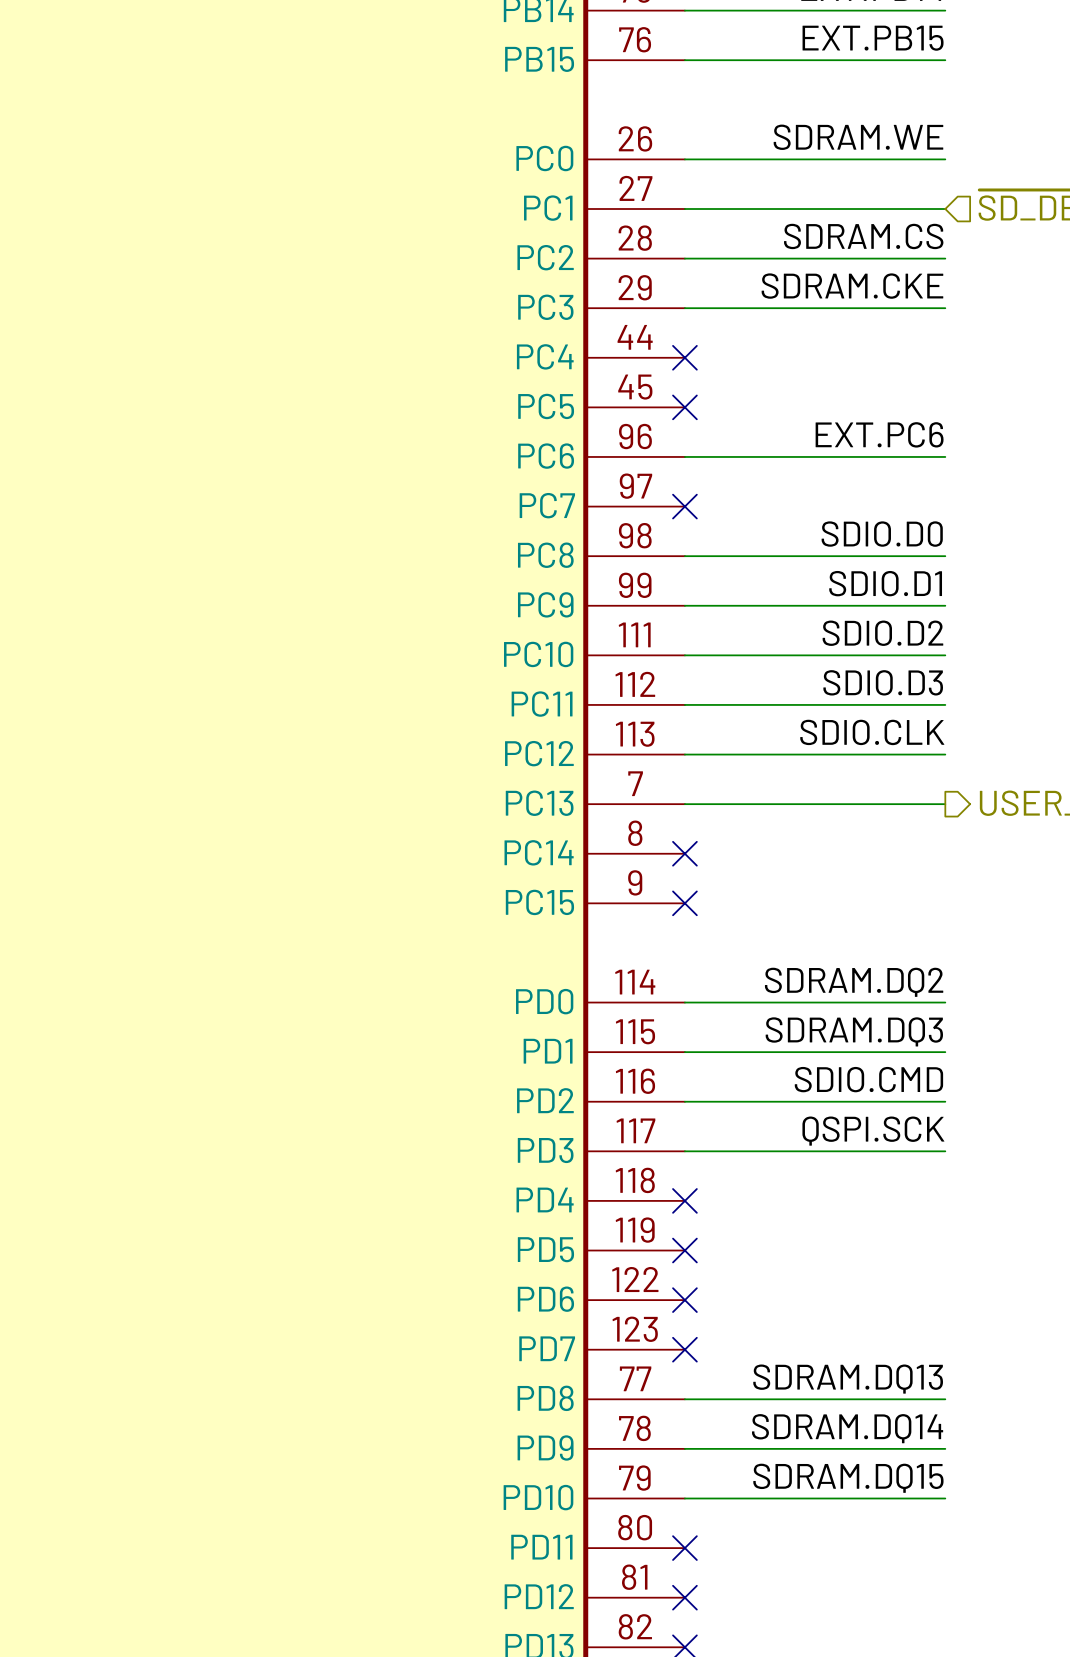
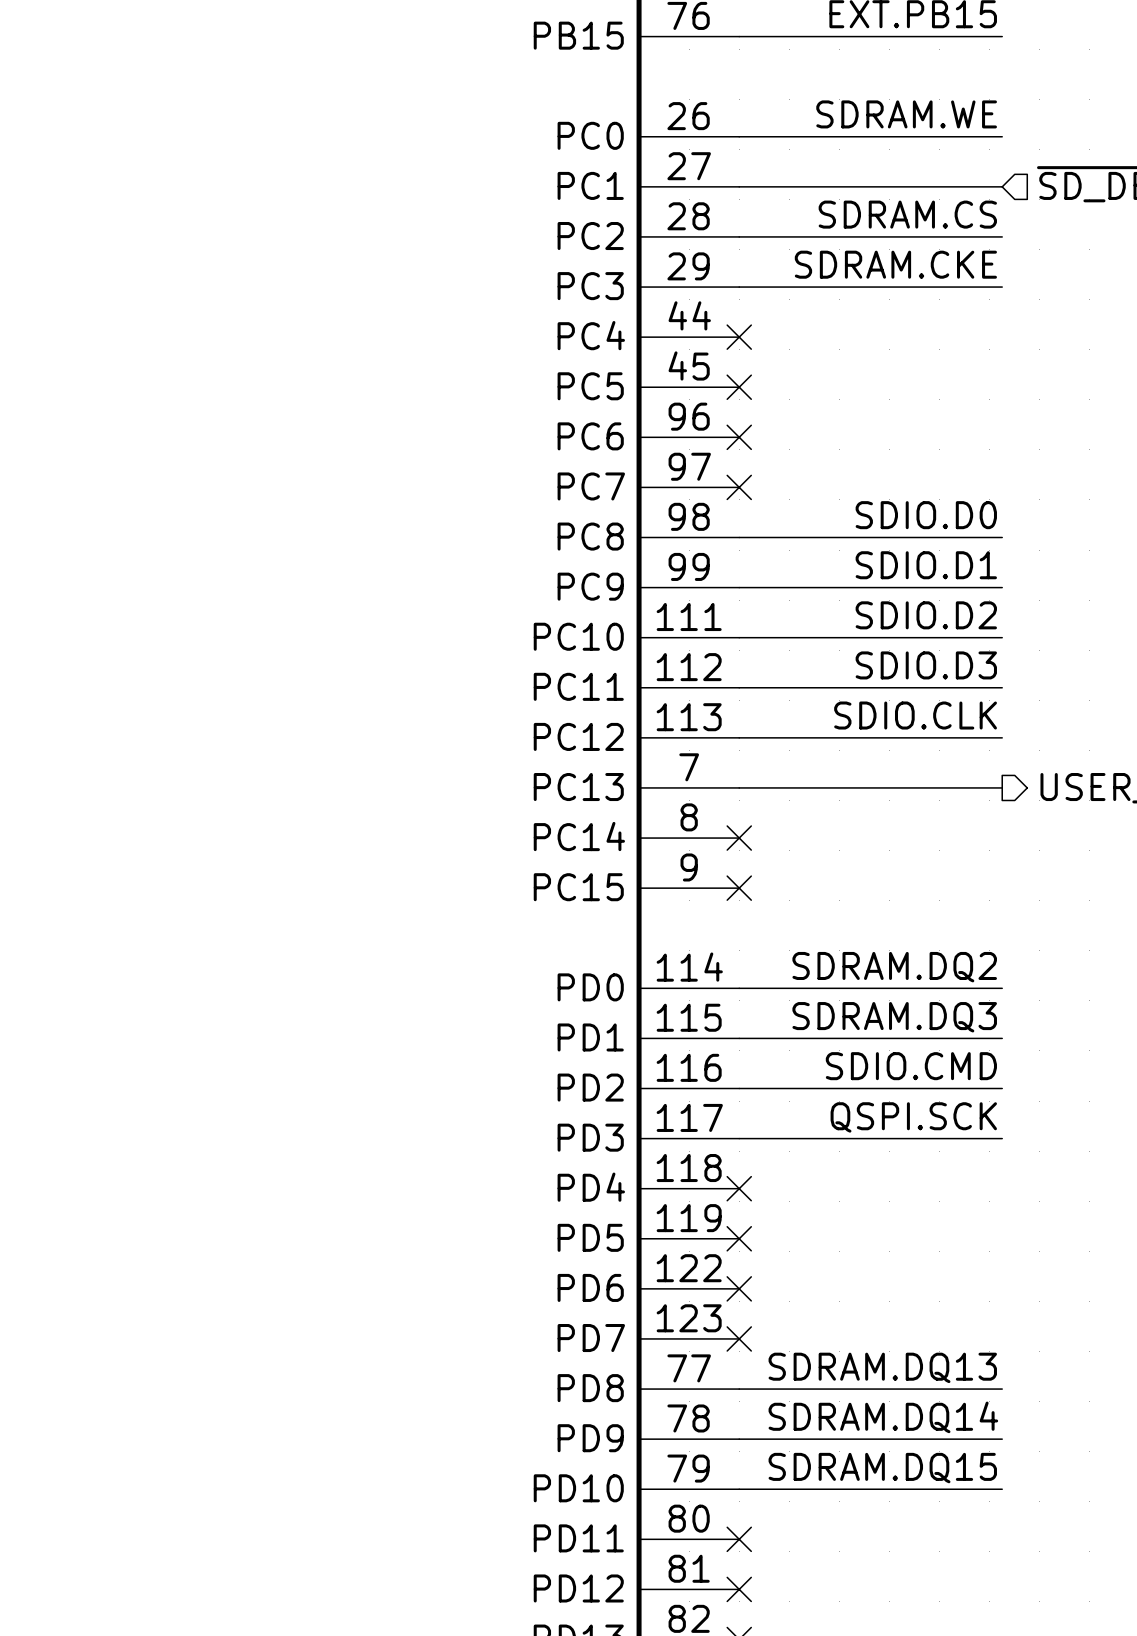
label: EXT.PC6 (879, 434) -> none
wire: (684, 456) (945, 456) -> none
no-connect mark: none -> (739, 437)

